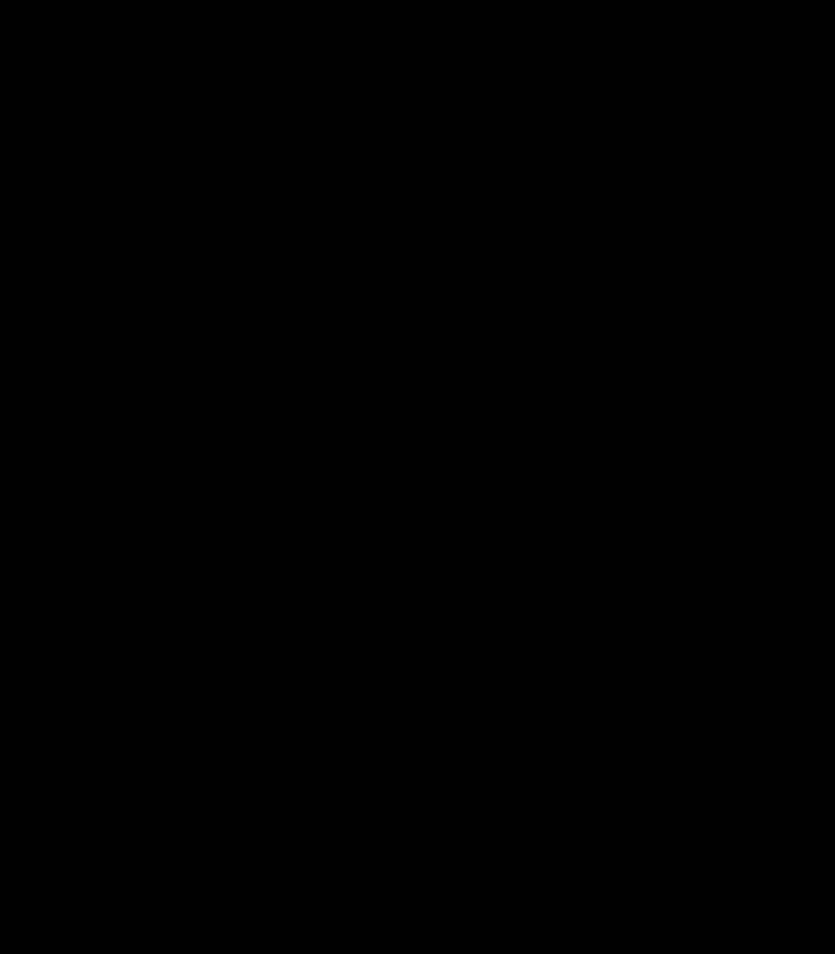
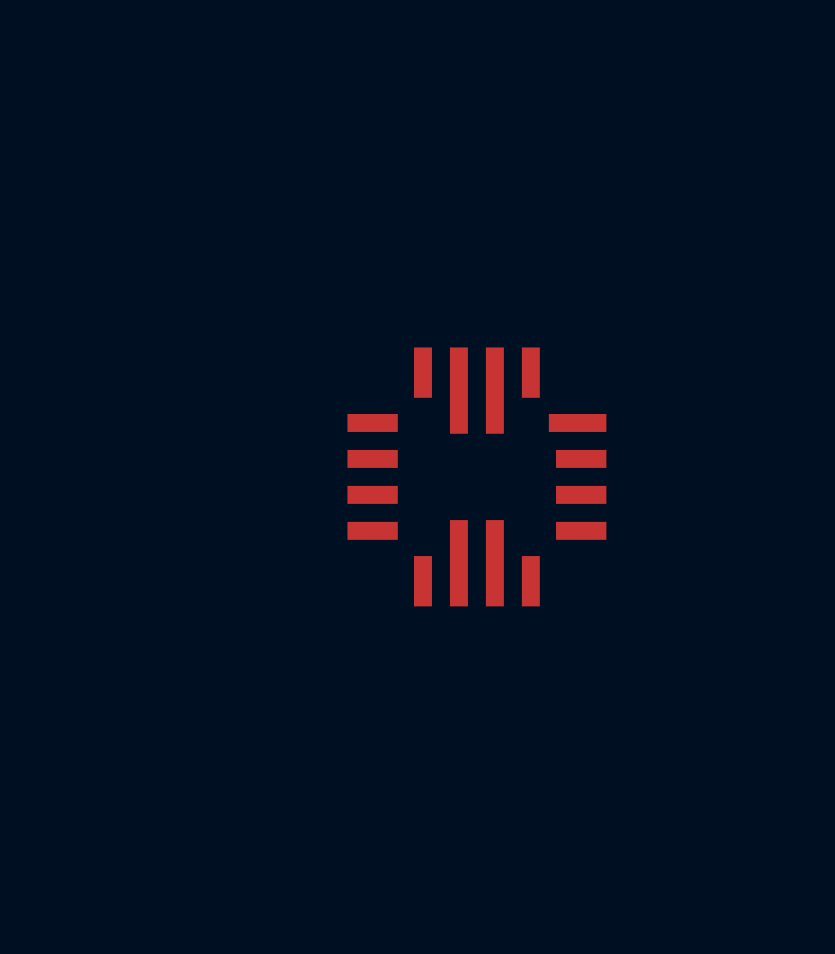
part: none -> (476, 476)

